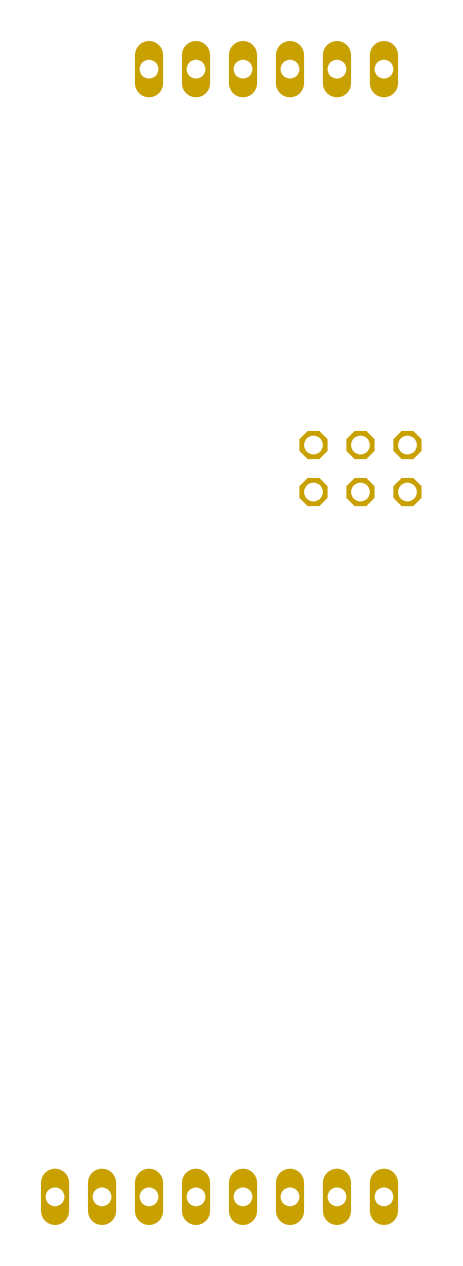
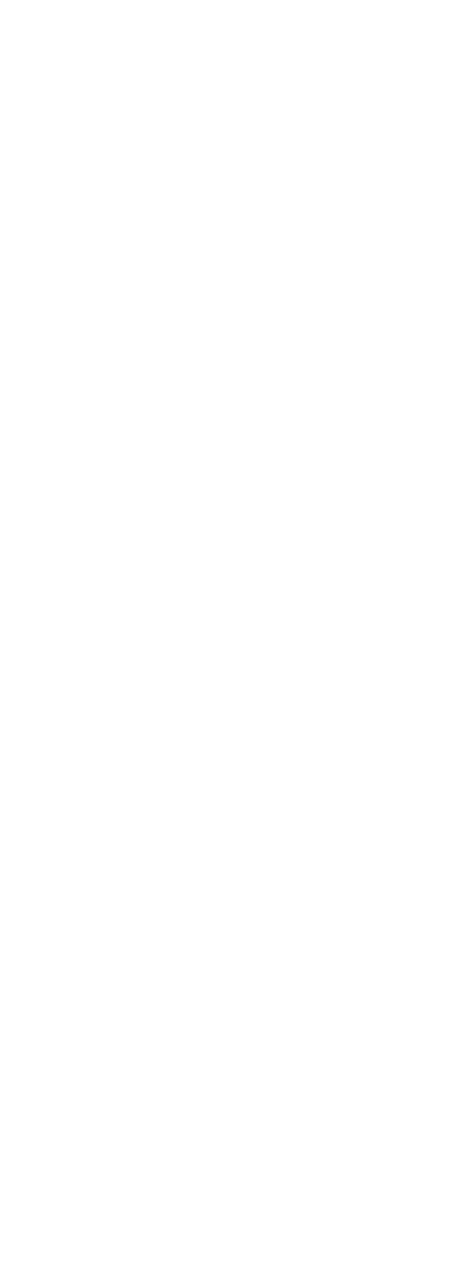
part: (266, 69) -> none
part: (360, 468) -> none
part: (219, 1196) -> none

